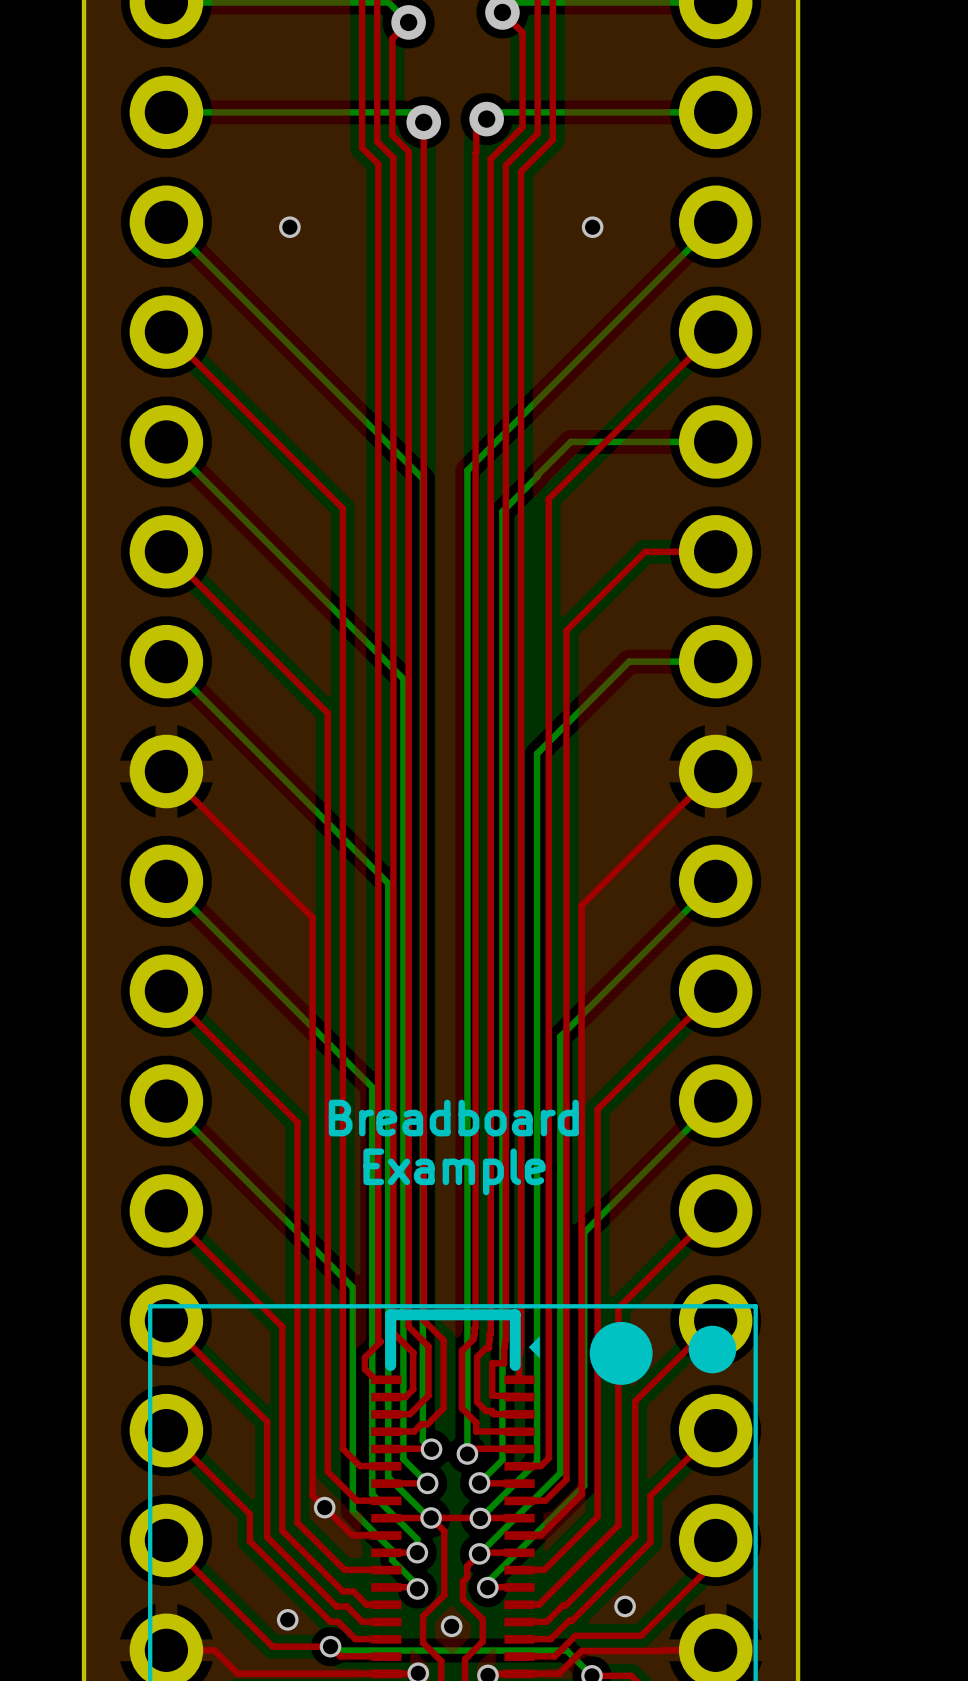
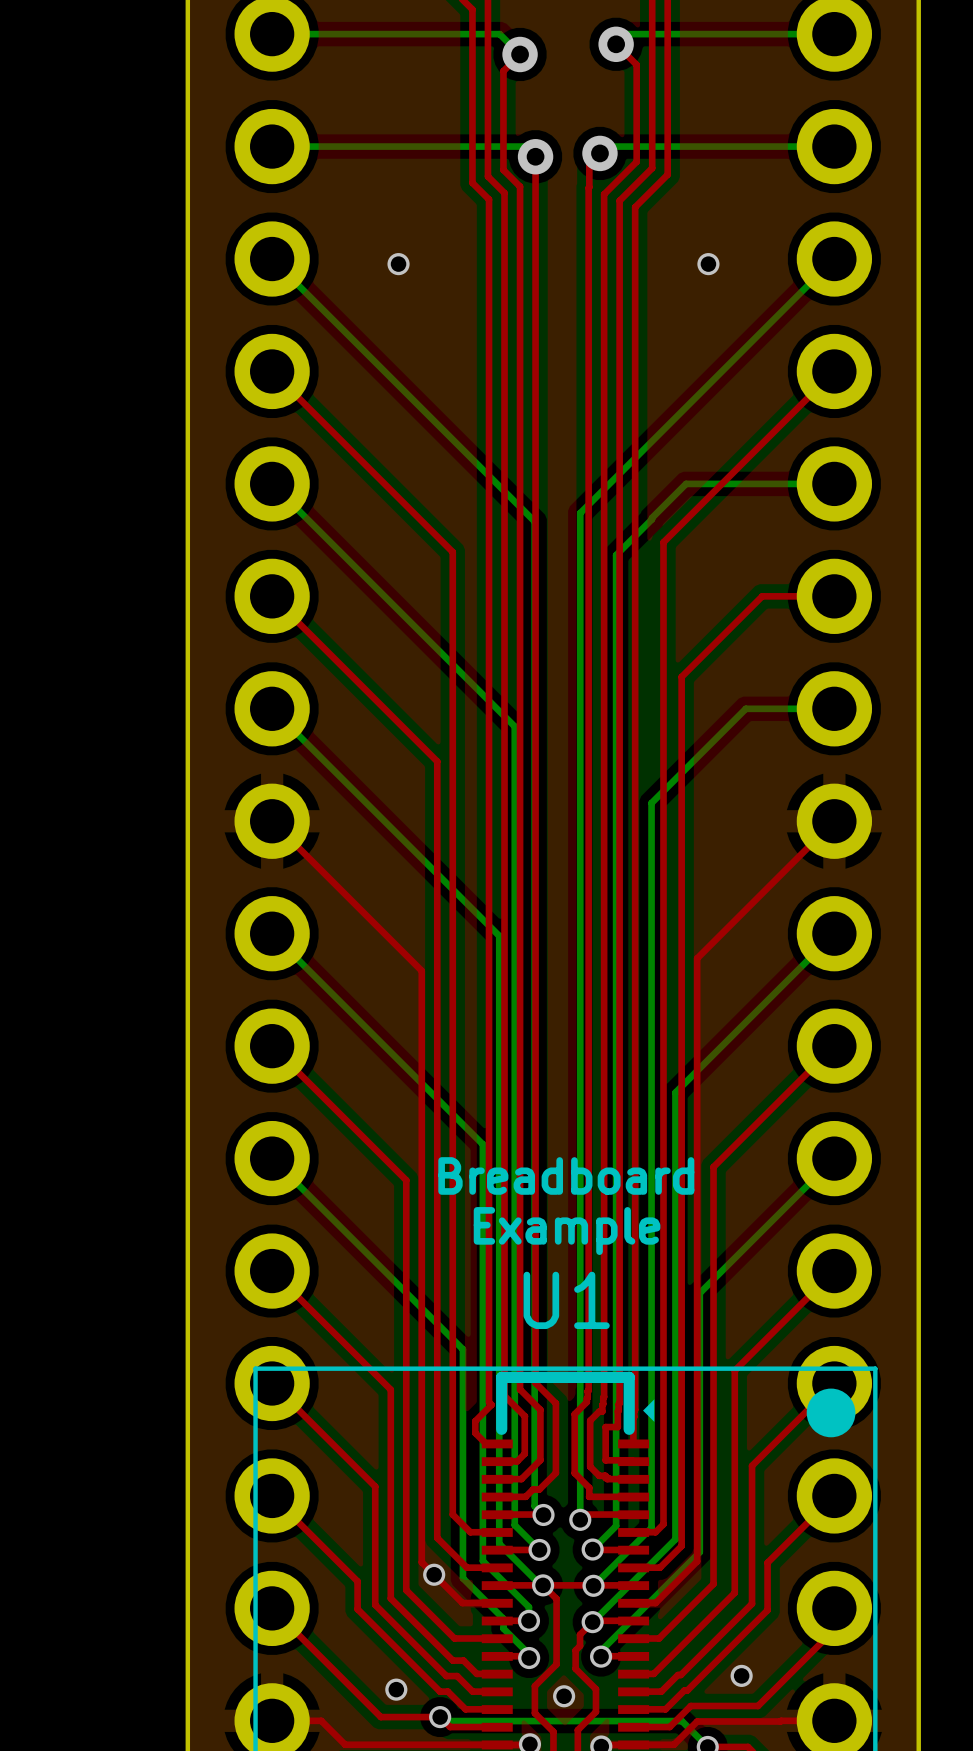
U1 name: none -> U1 (566, 1300)
drawing: [589, 1321, 653, 1385] -> none

